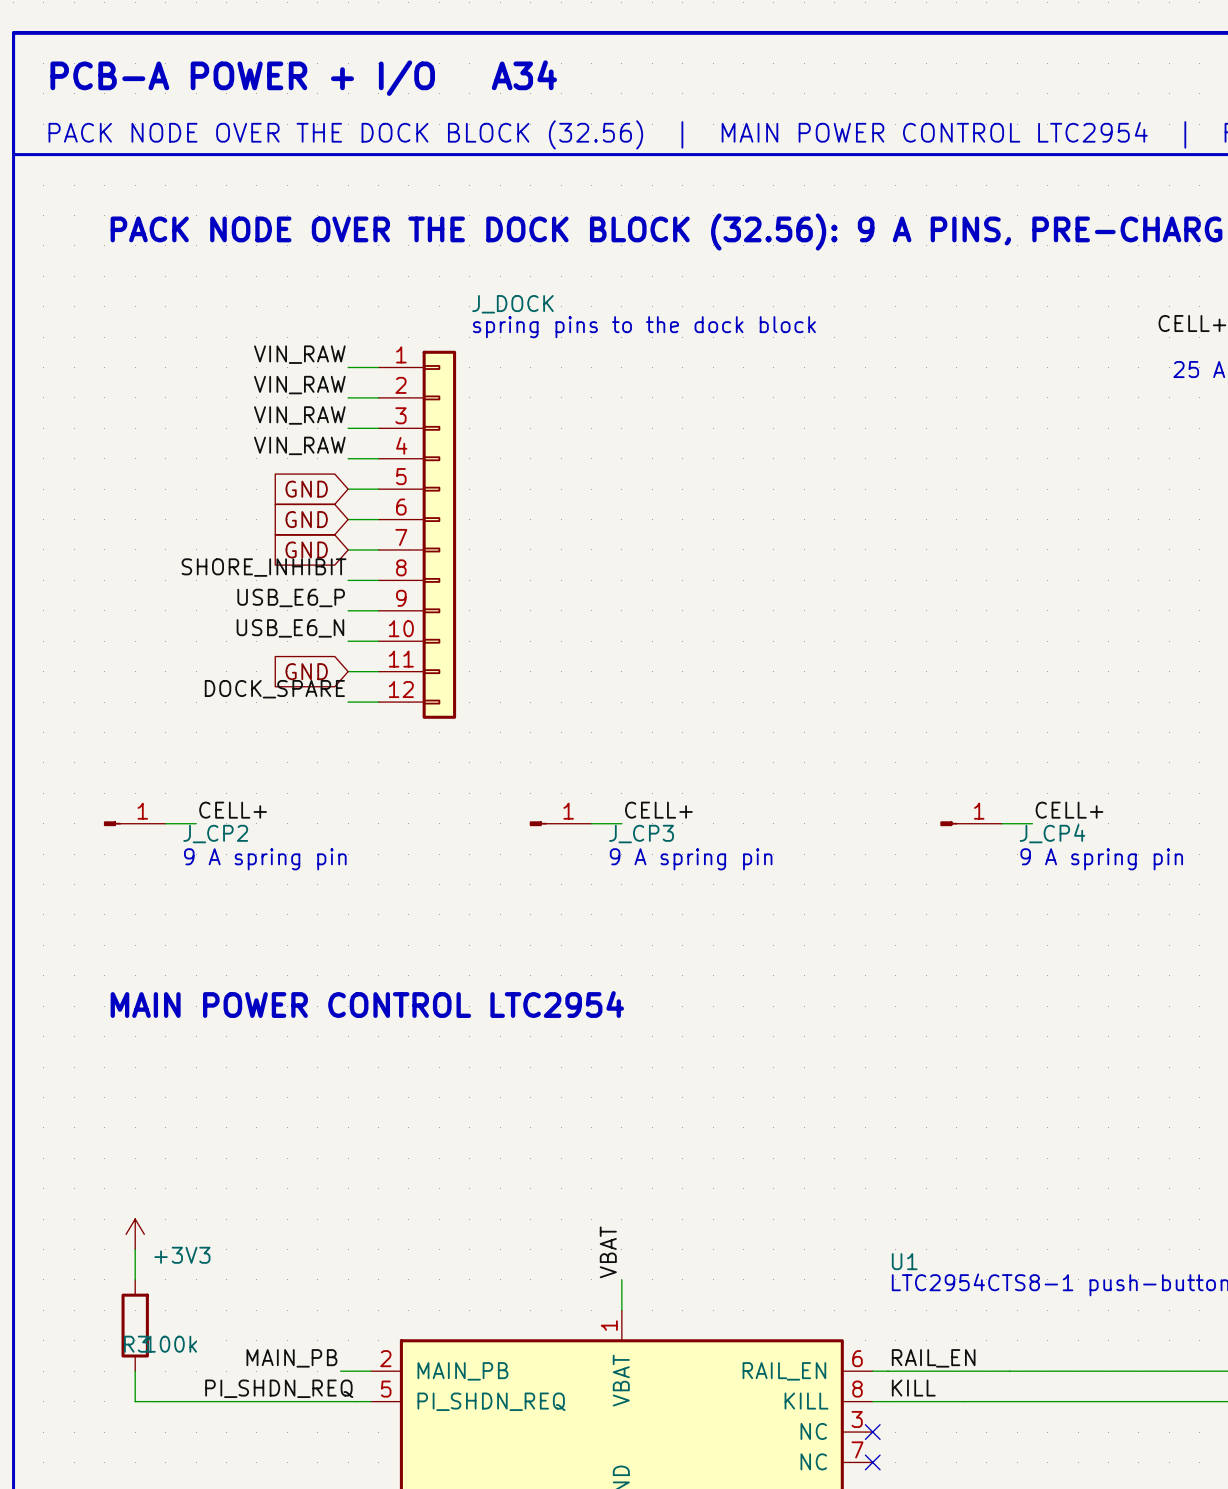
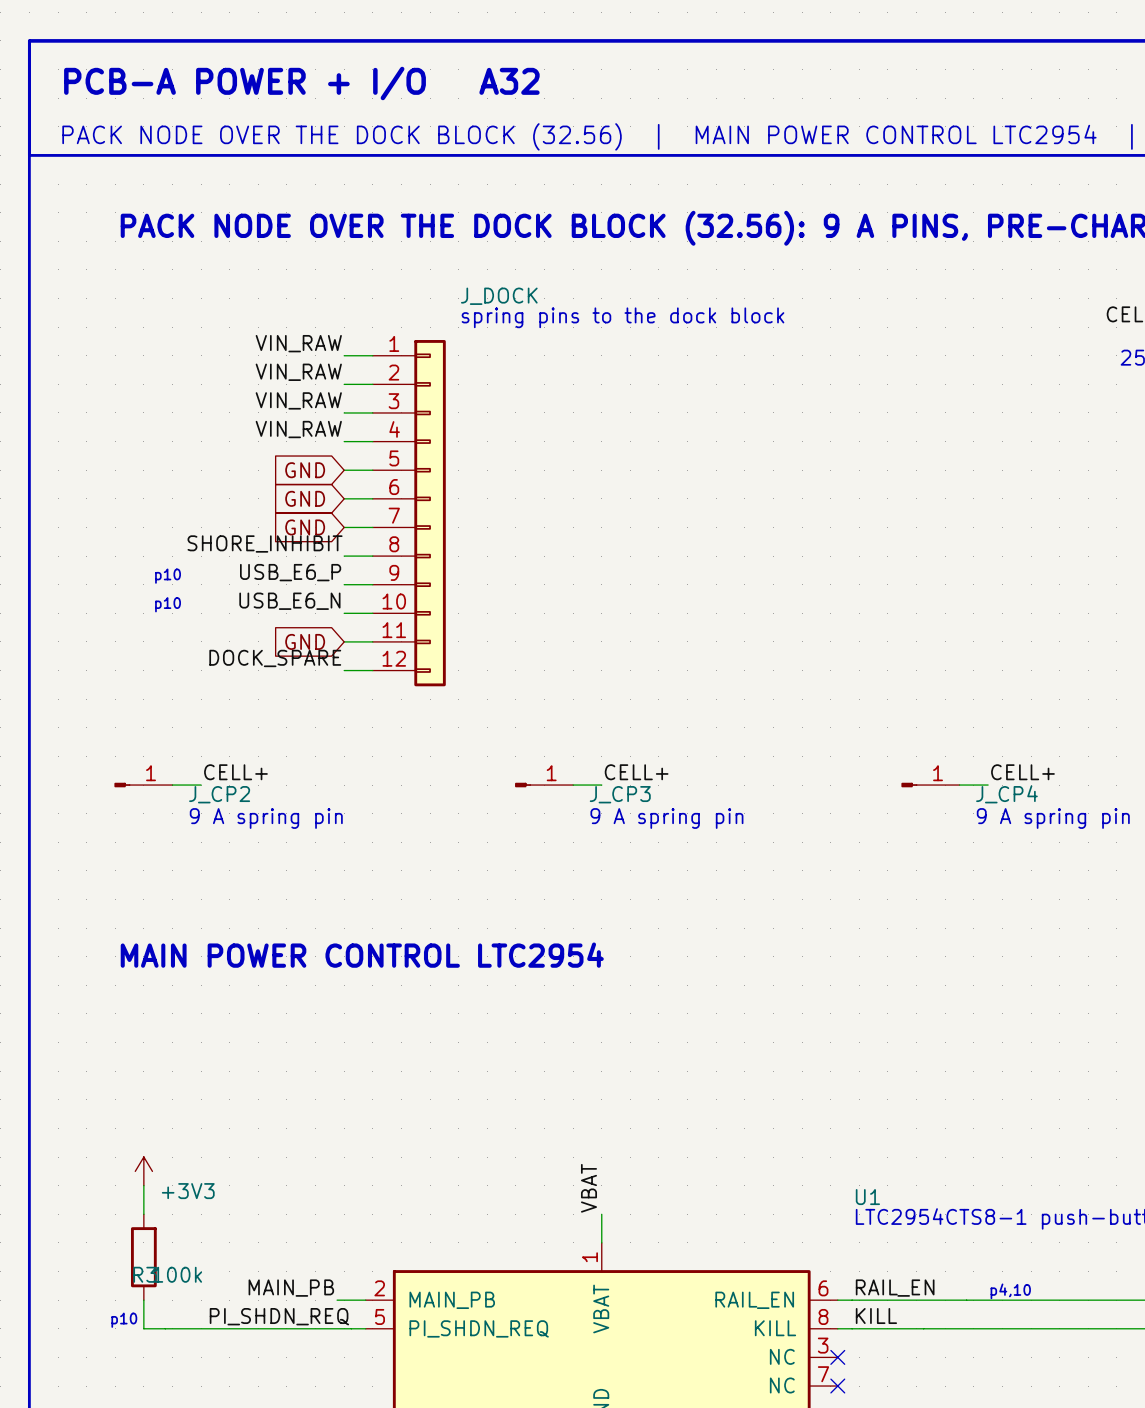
text: PCB-A POWER + I/O A34 (303, 78) -> PCB-A POWER + I/O A32 (301, 83)
text: none -> p10 (168, 576)
text: none -> p10 (168, 604)
text: none -> p4,10 (1010, 1291)
text: none -> p10 (124, 1320)

